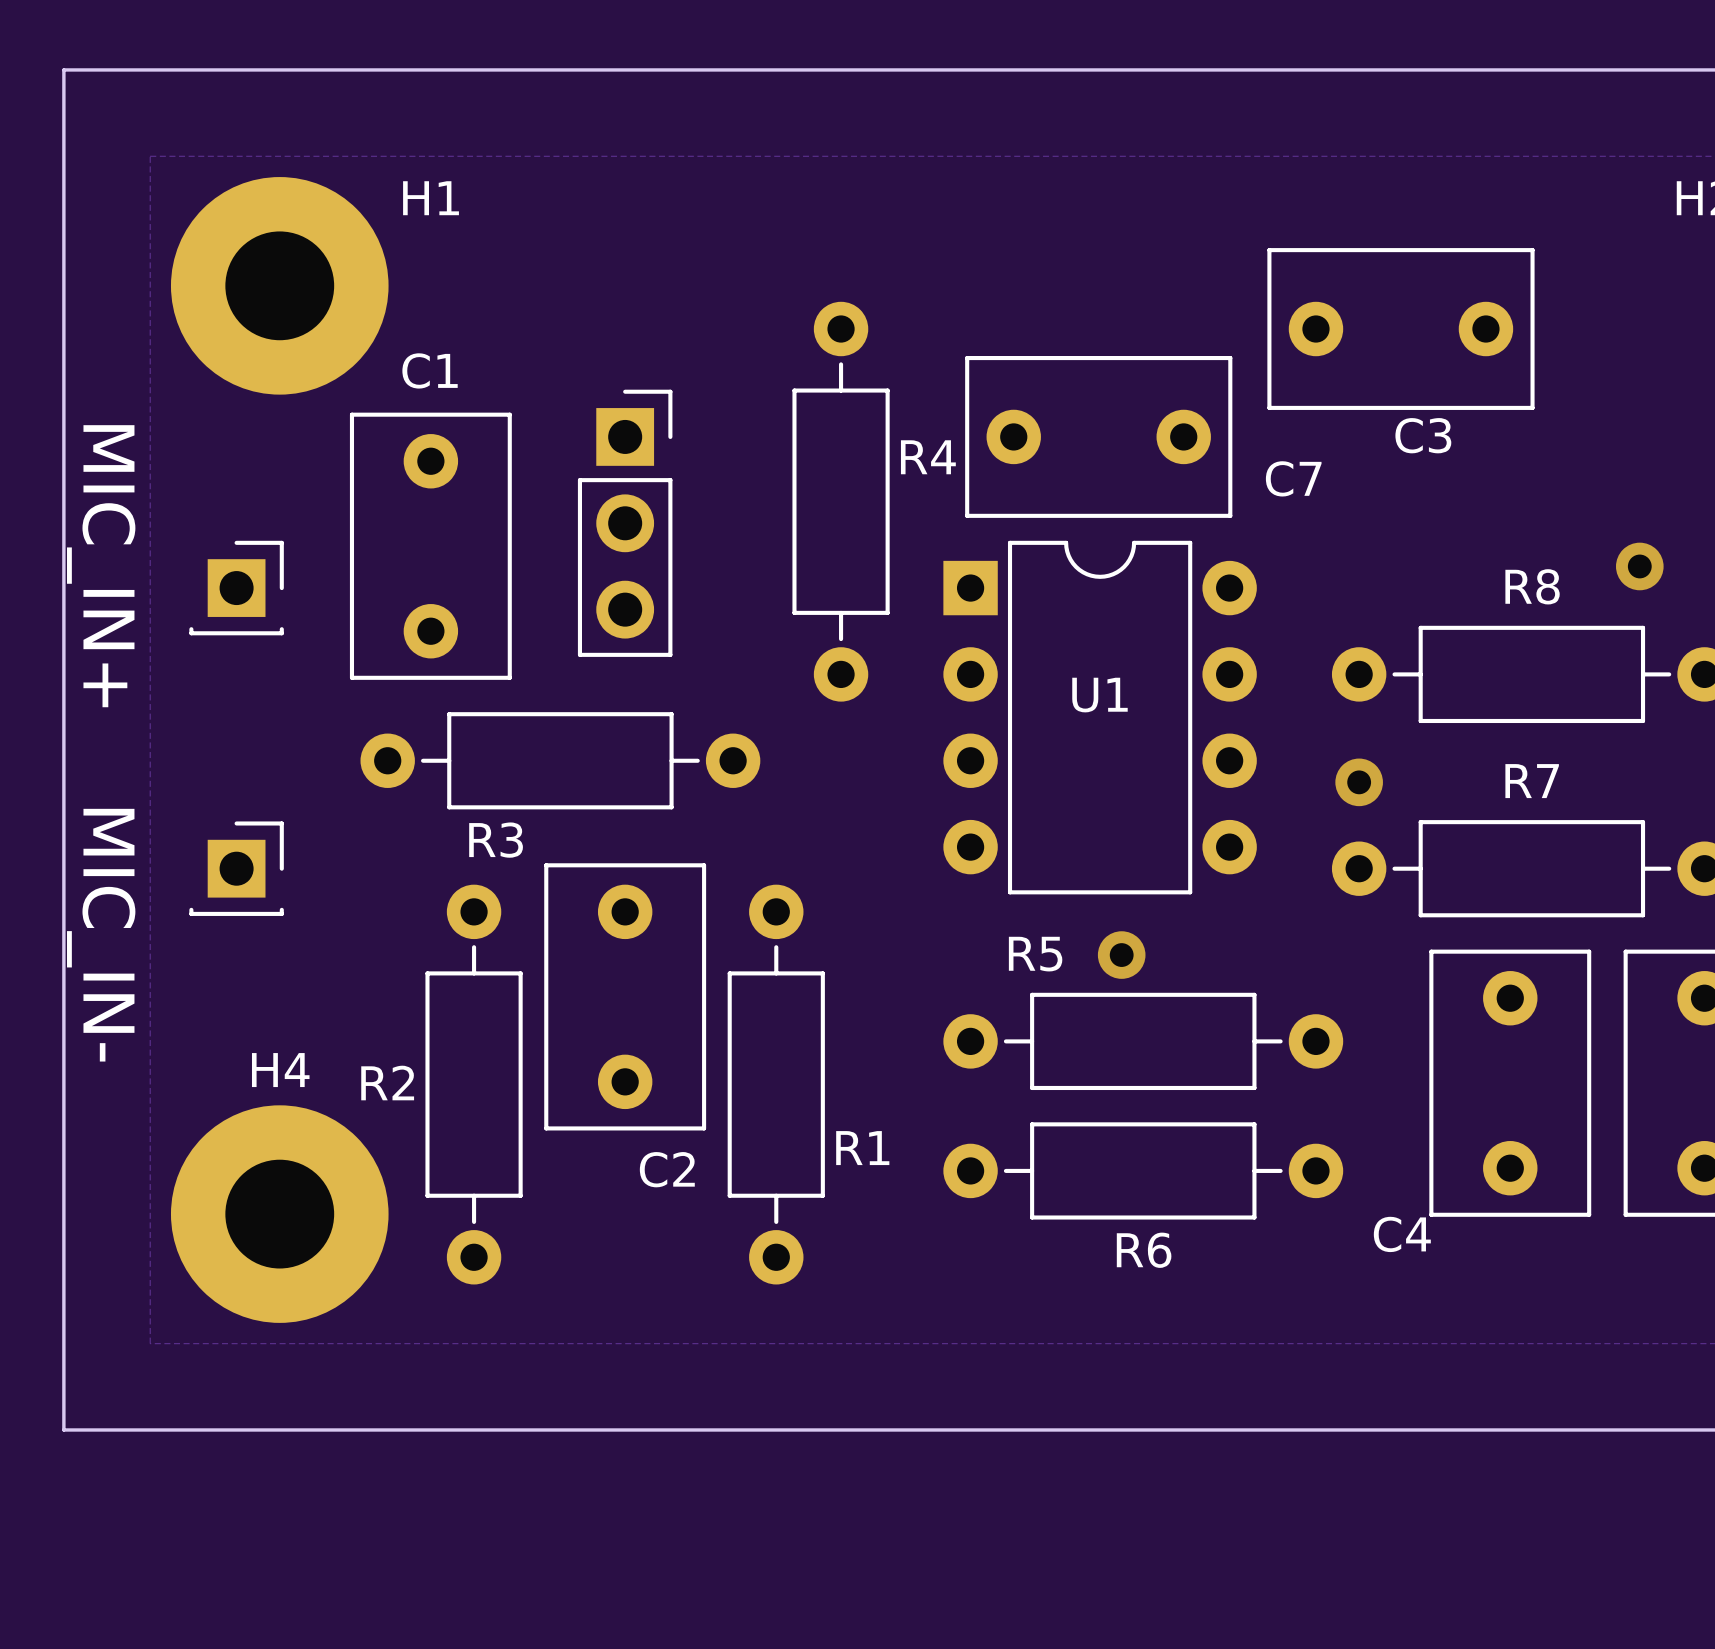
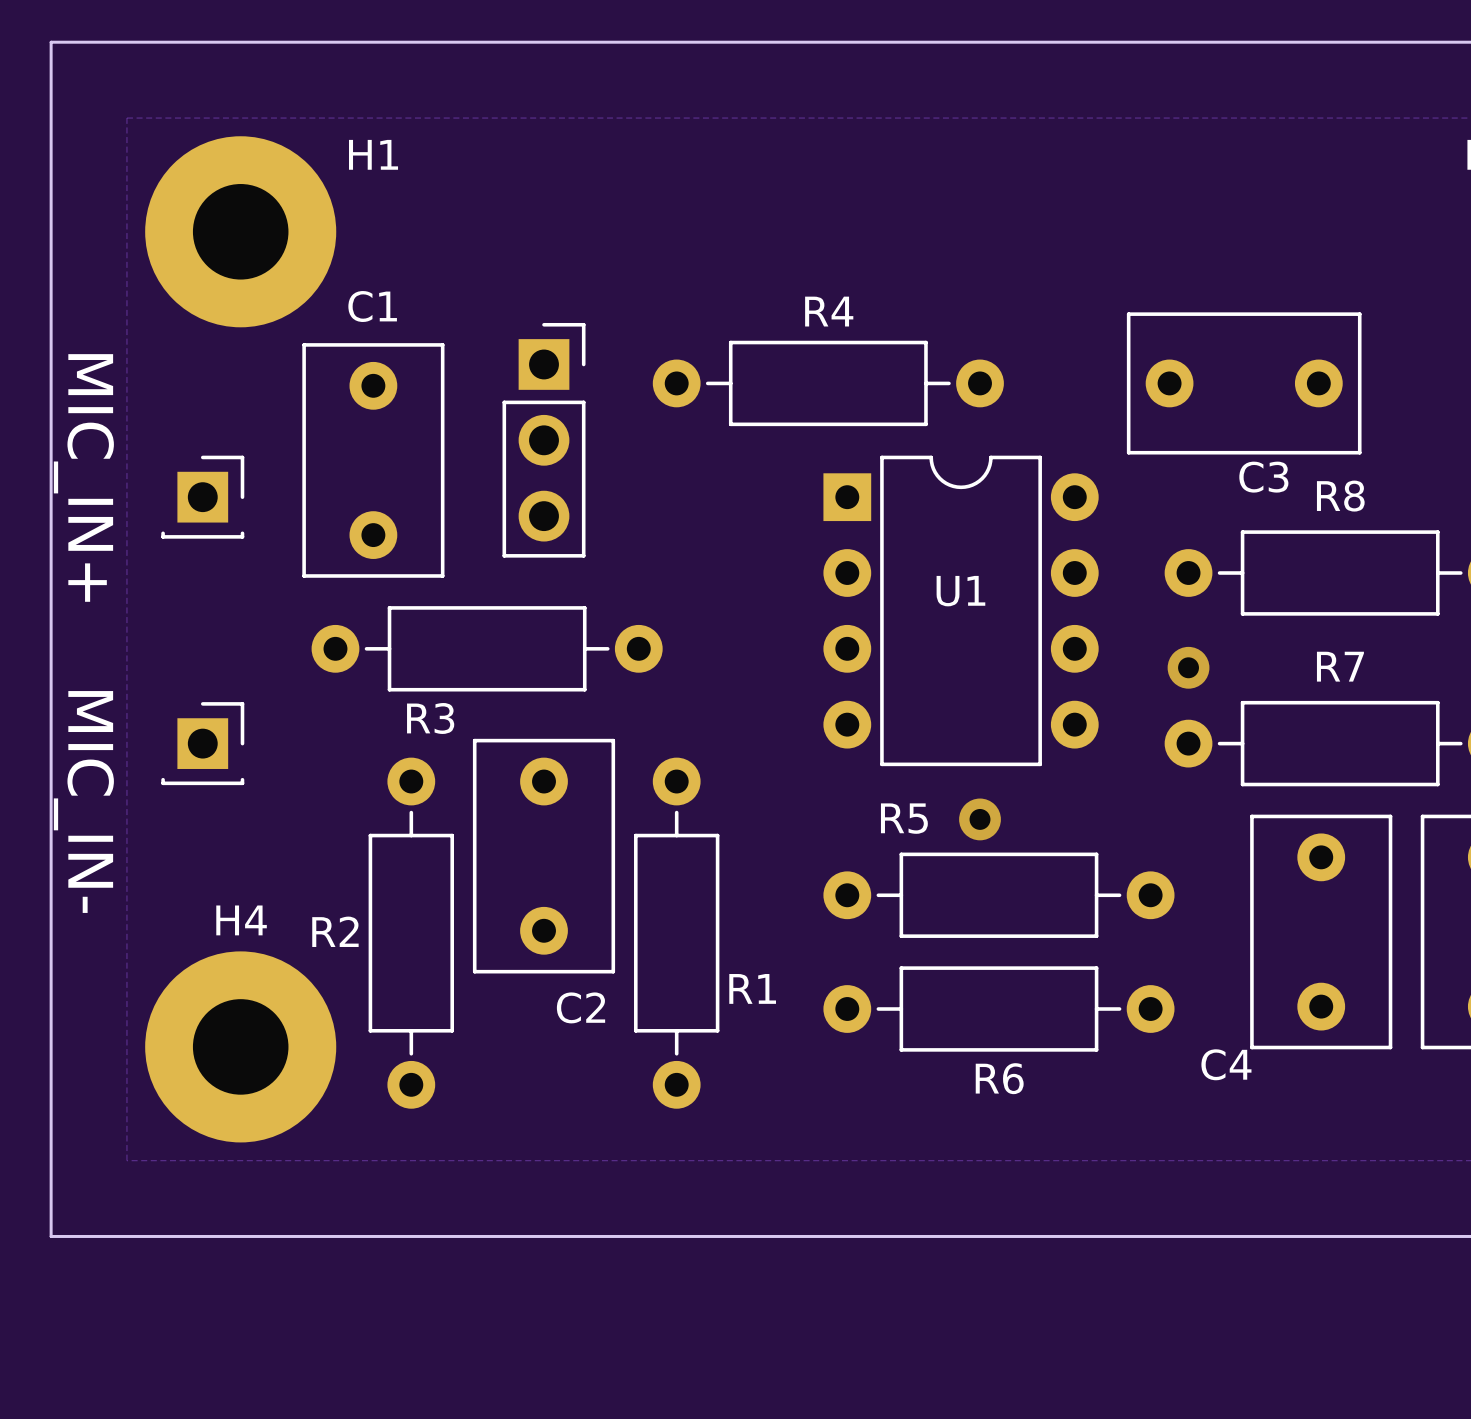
C3 position: (1400, 329) -> (1244, 383)
C7: (1098, 436) -> none
R4 name position: R4 (928, 457) -> R4 (829, 311)
R4 rotation: 0° (841, 501) -> 90° clockwise (828, 383)
via: (1639, 566) -> none

